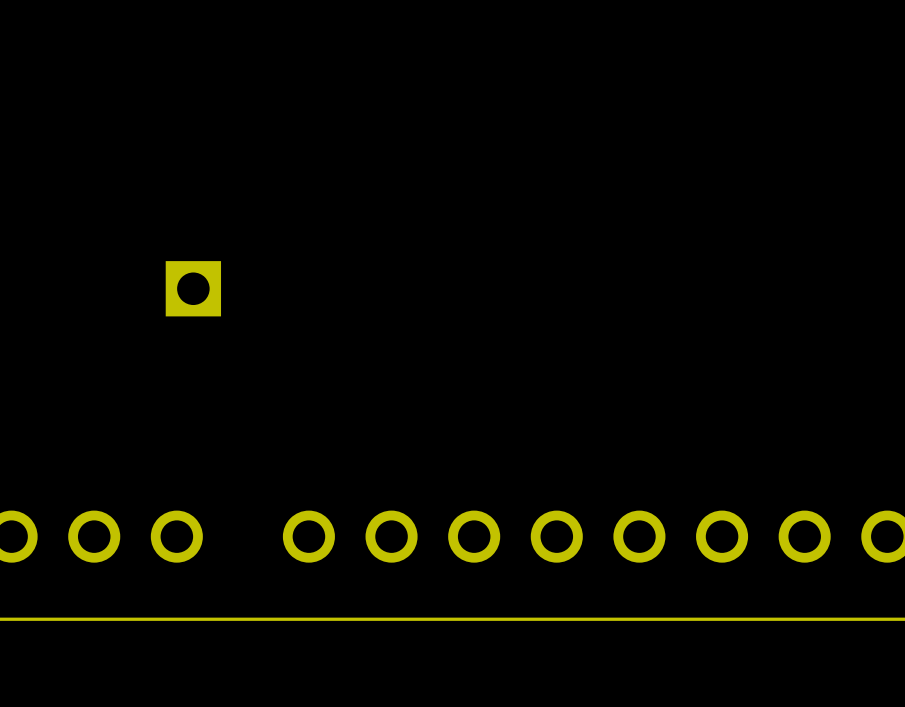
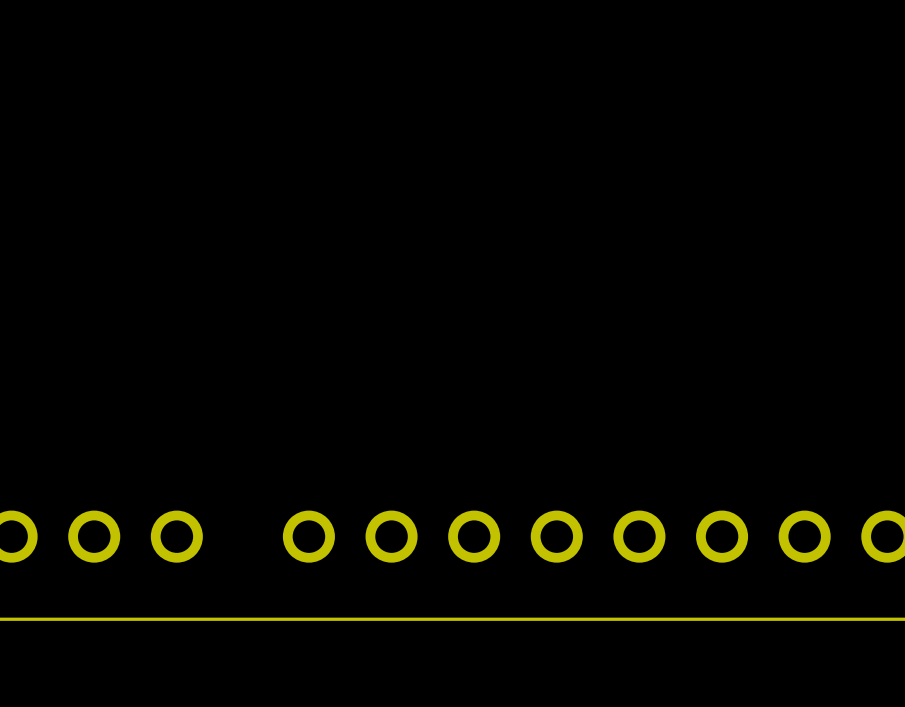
part: (193, 288) -> none

